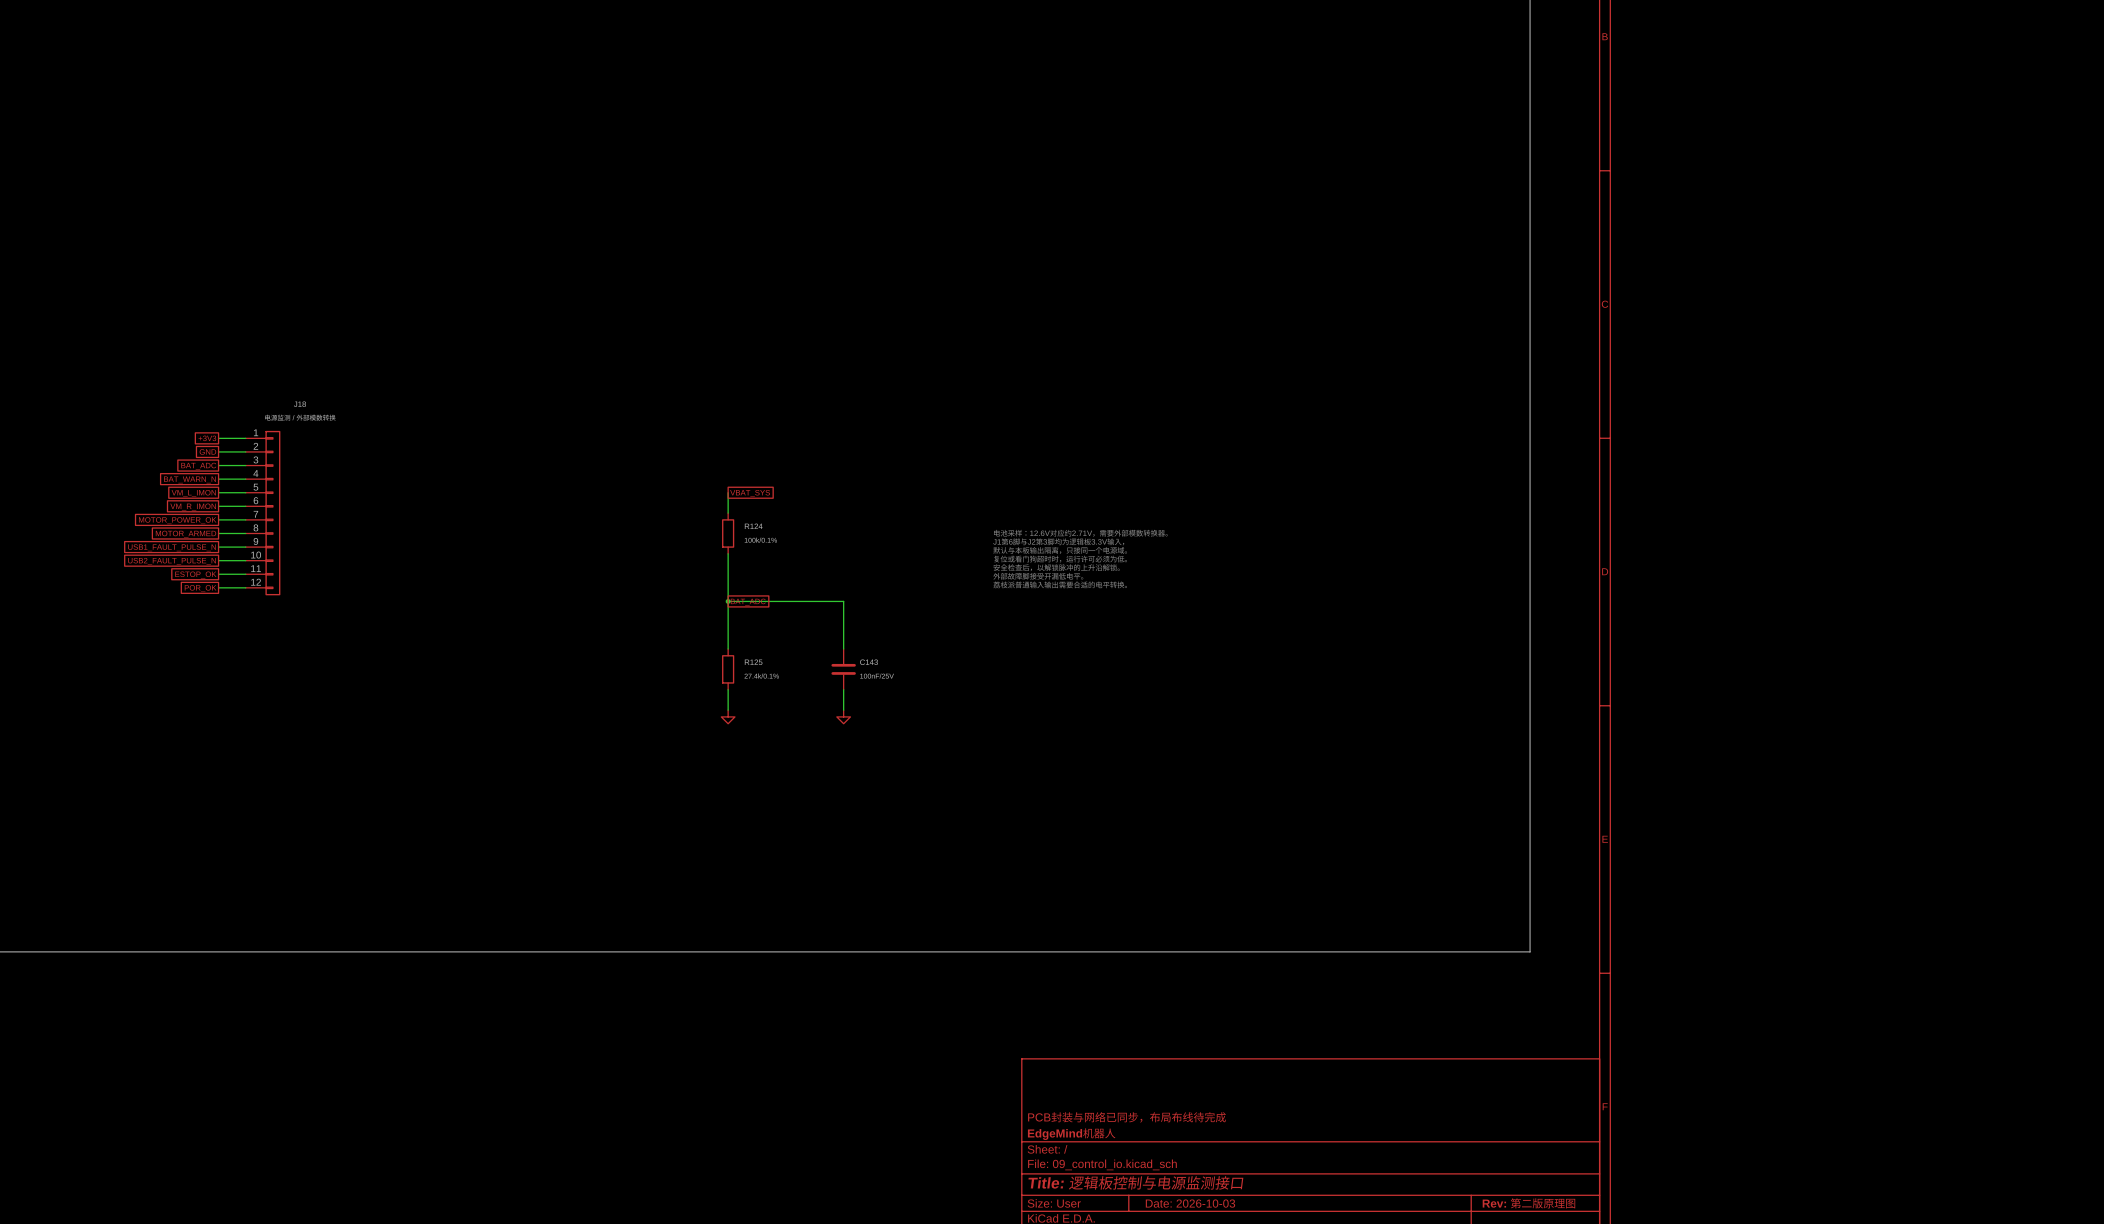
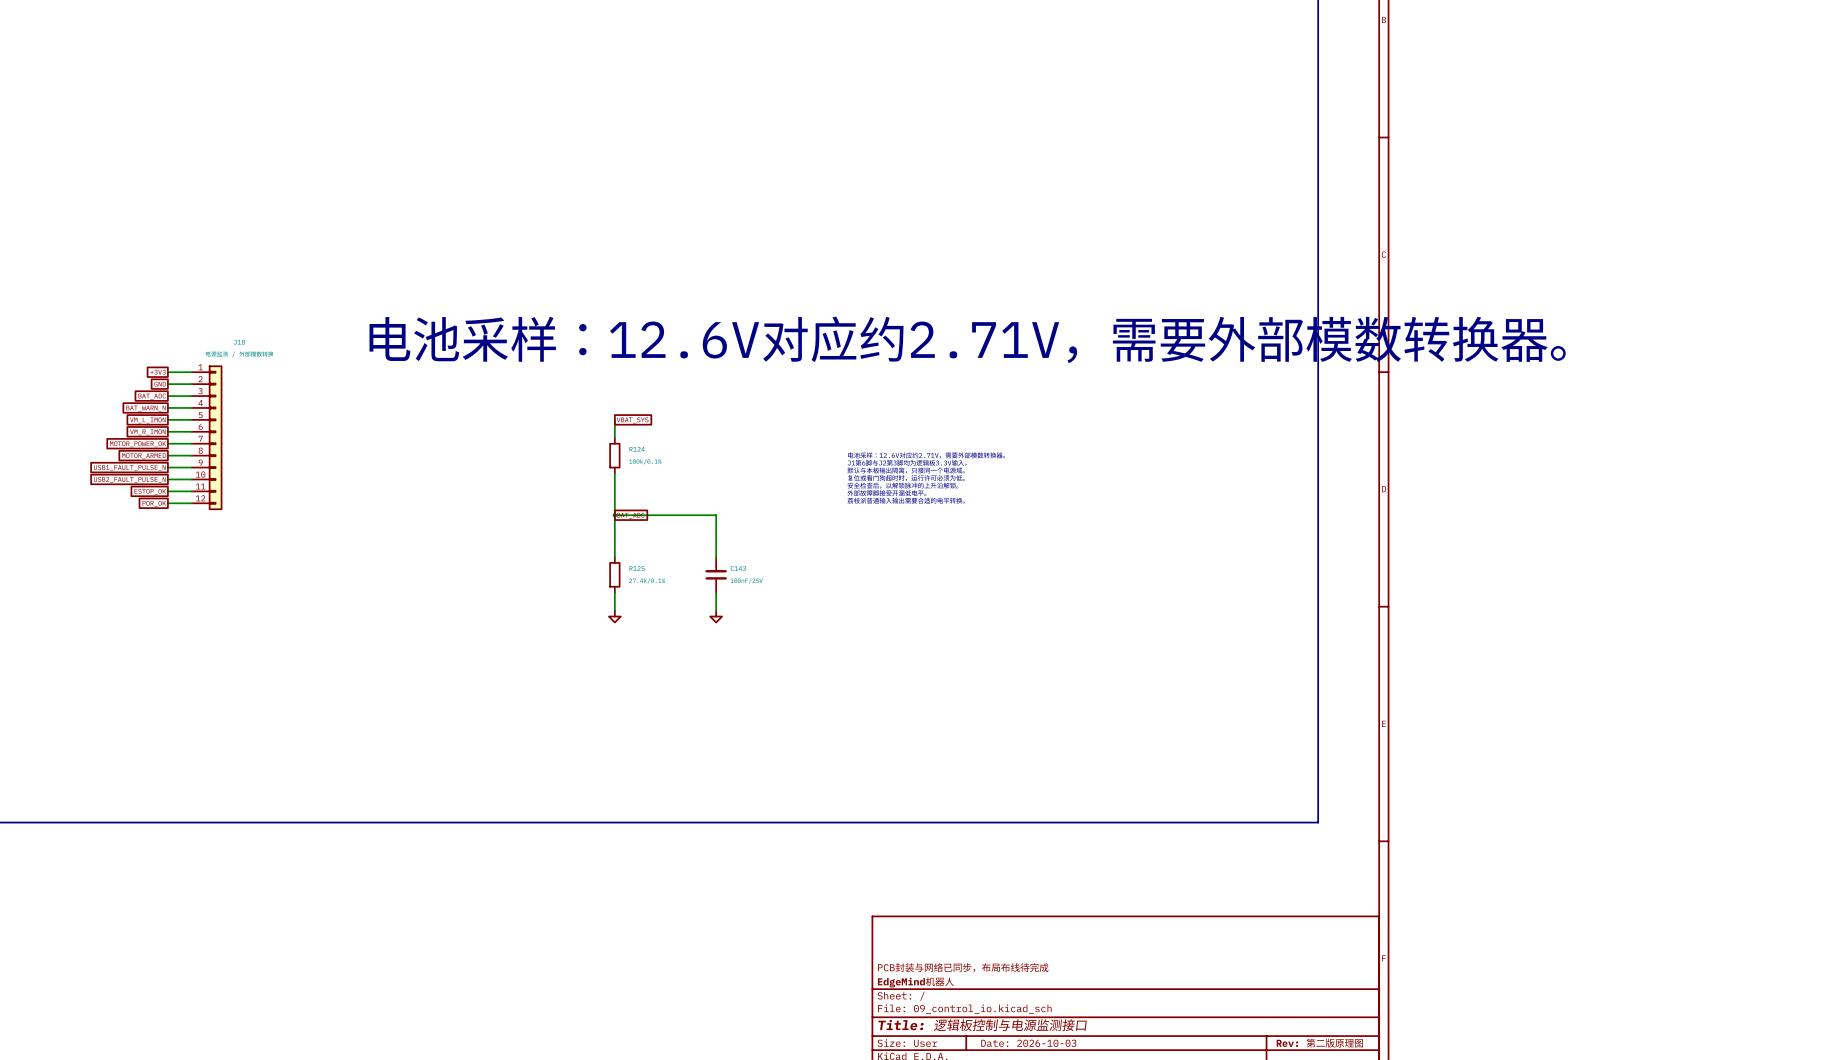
text: none -> 电池采样：12.6V对应约2.71V，需要外部模数转换器。 (967, 339)

